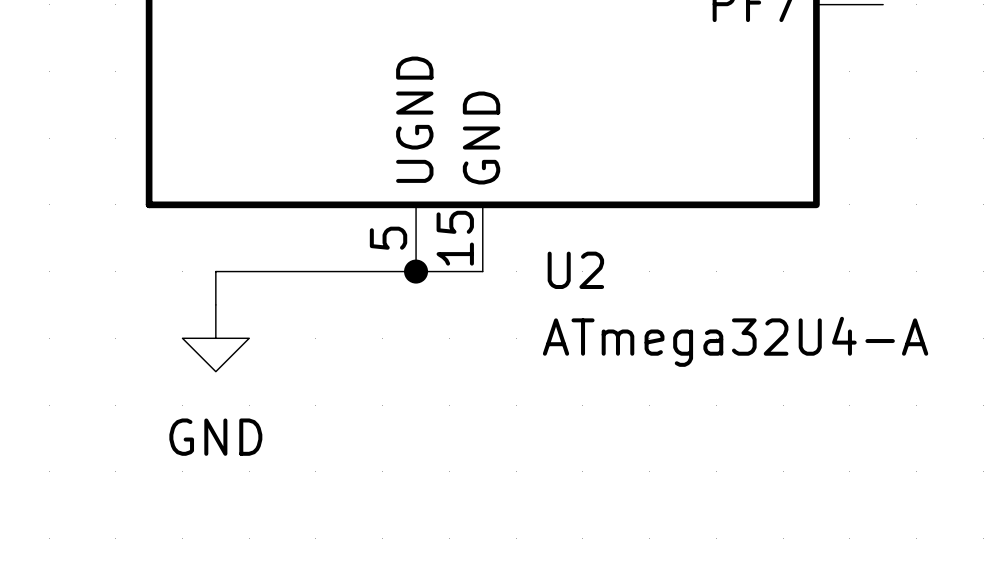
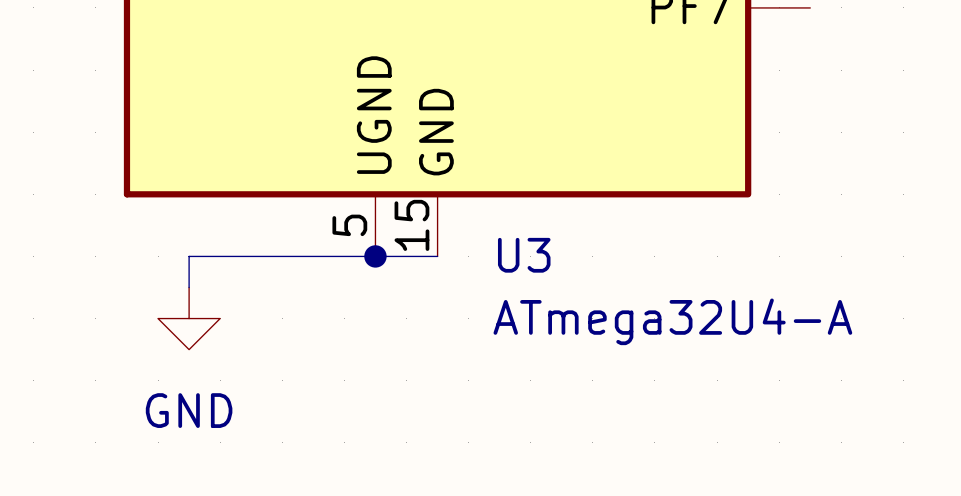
U2 name: U2 (575, 270) -> U3 (524, 255)

